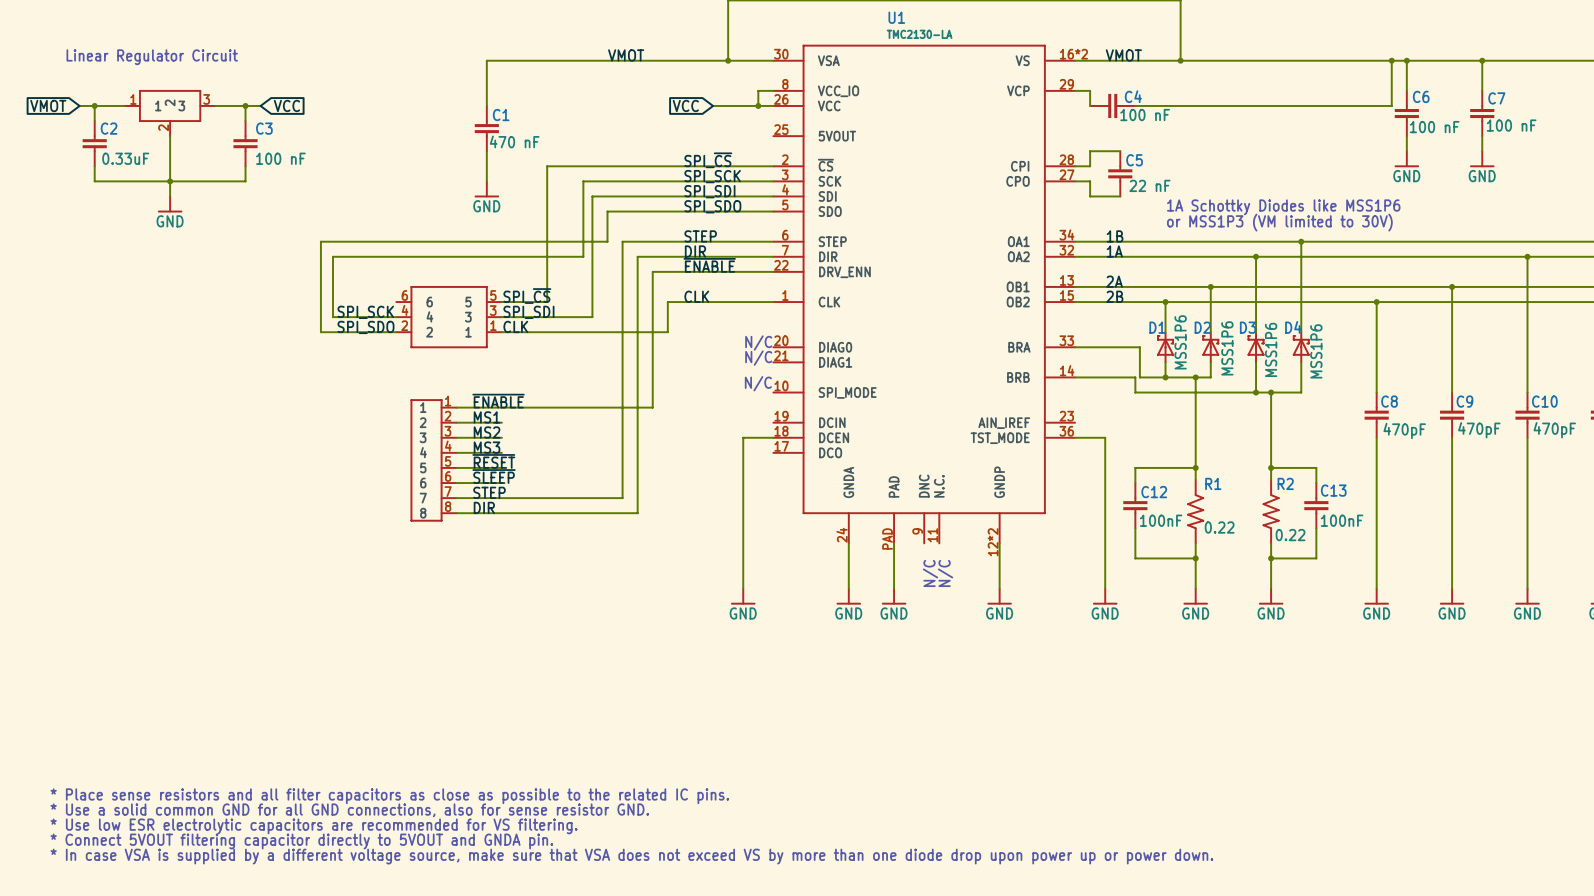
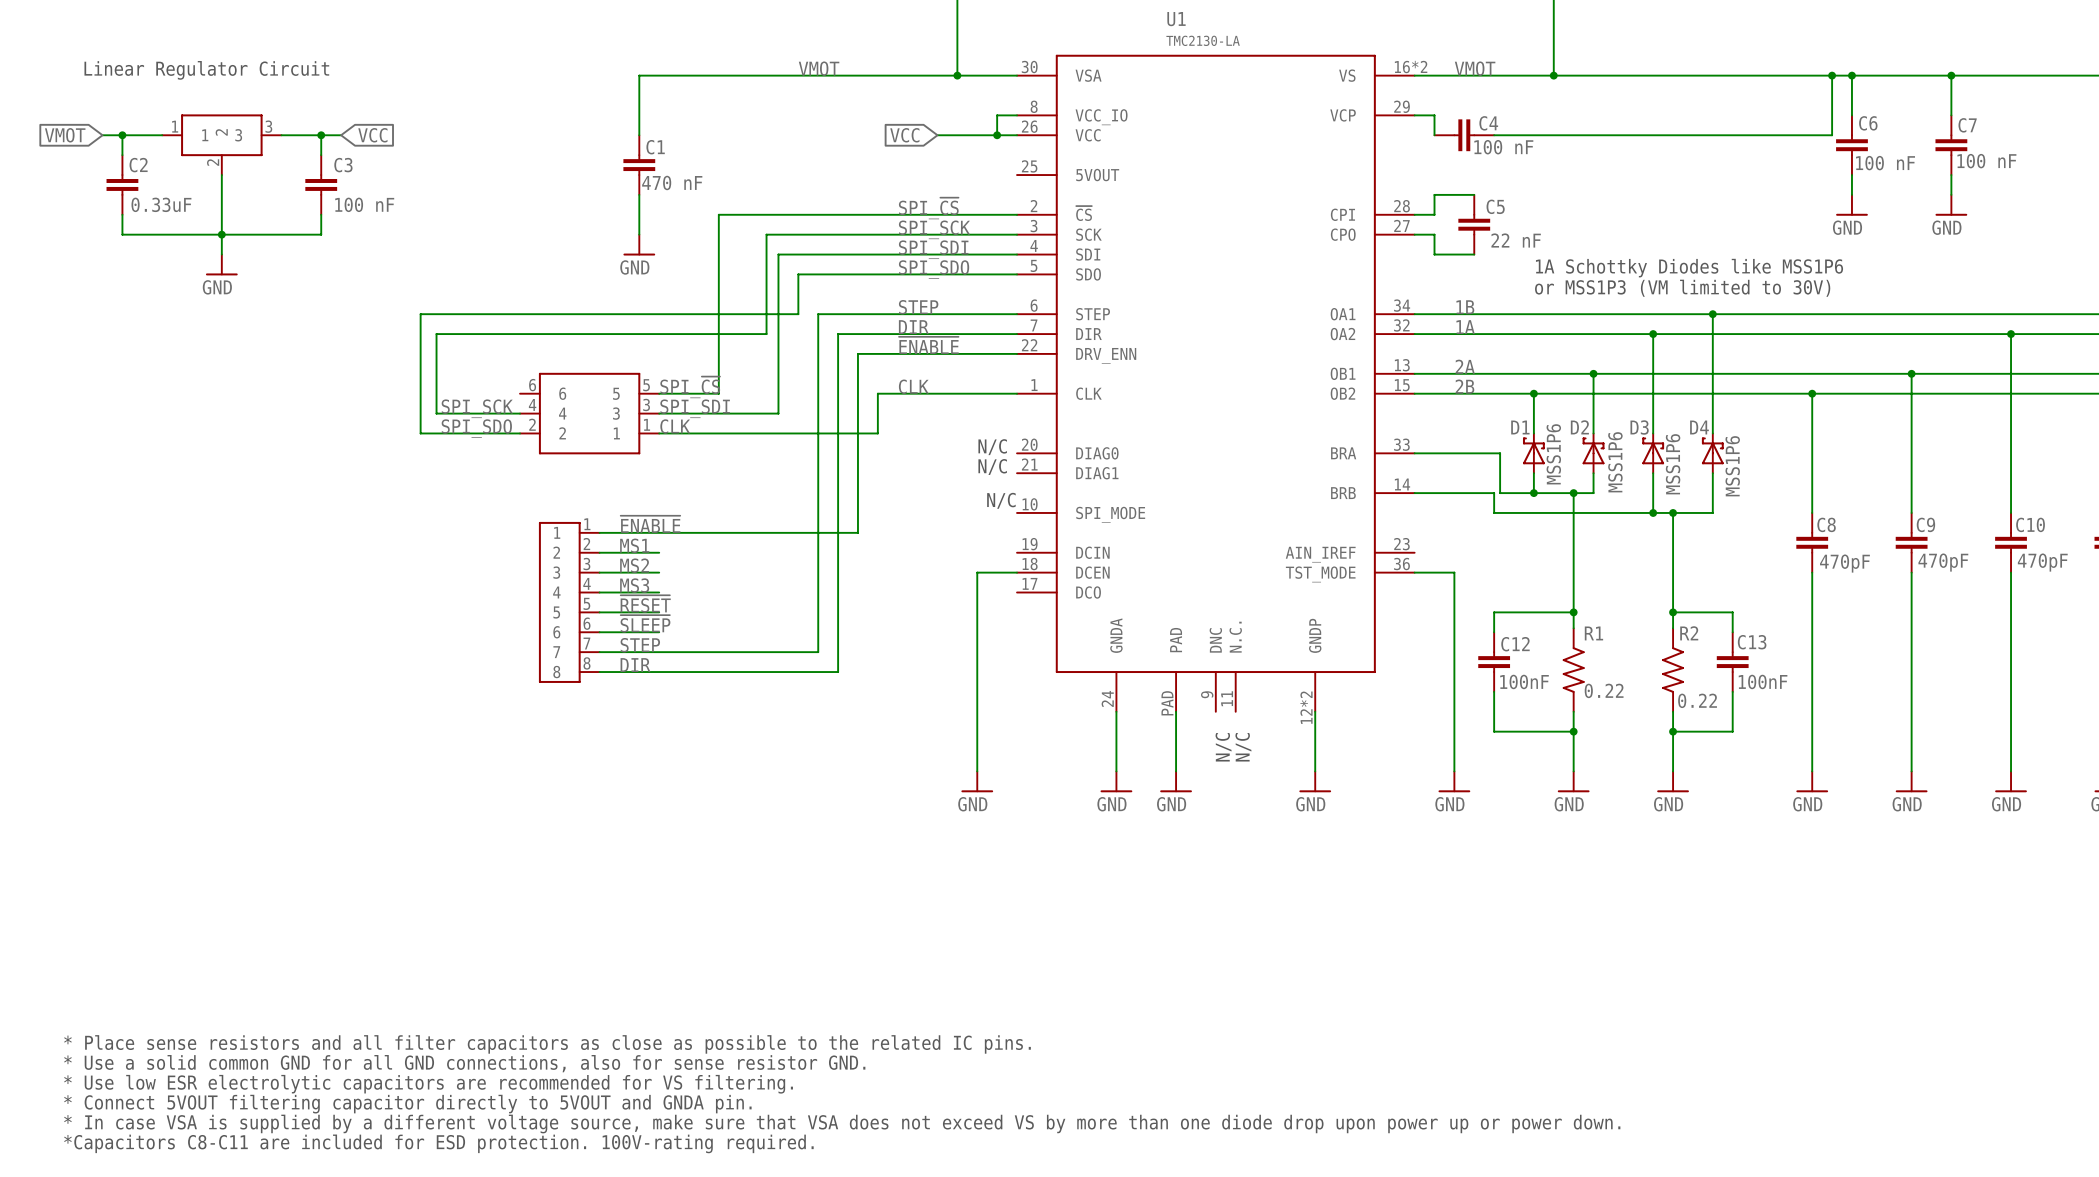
text: none -> *Capacitors C8-C11 are included for ESD protection. 100V-rating required. (438, 1143)

